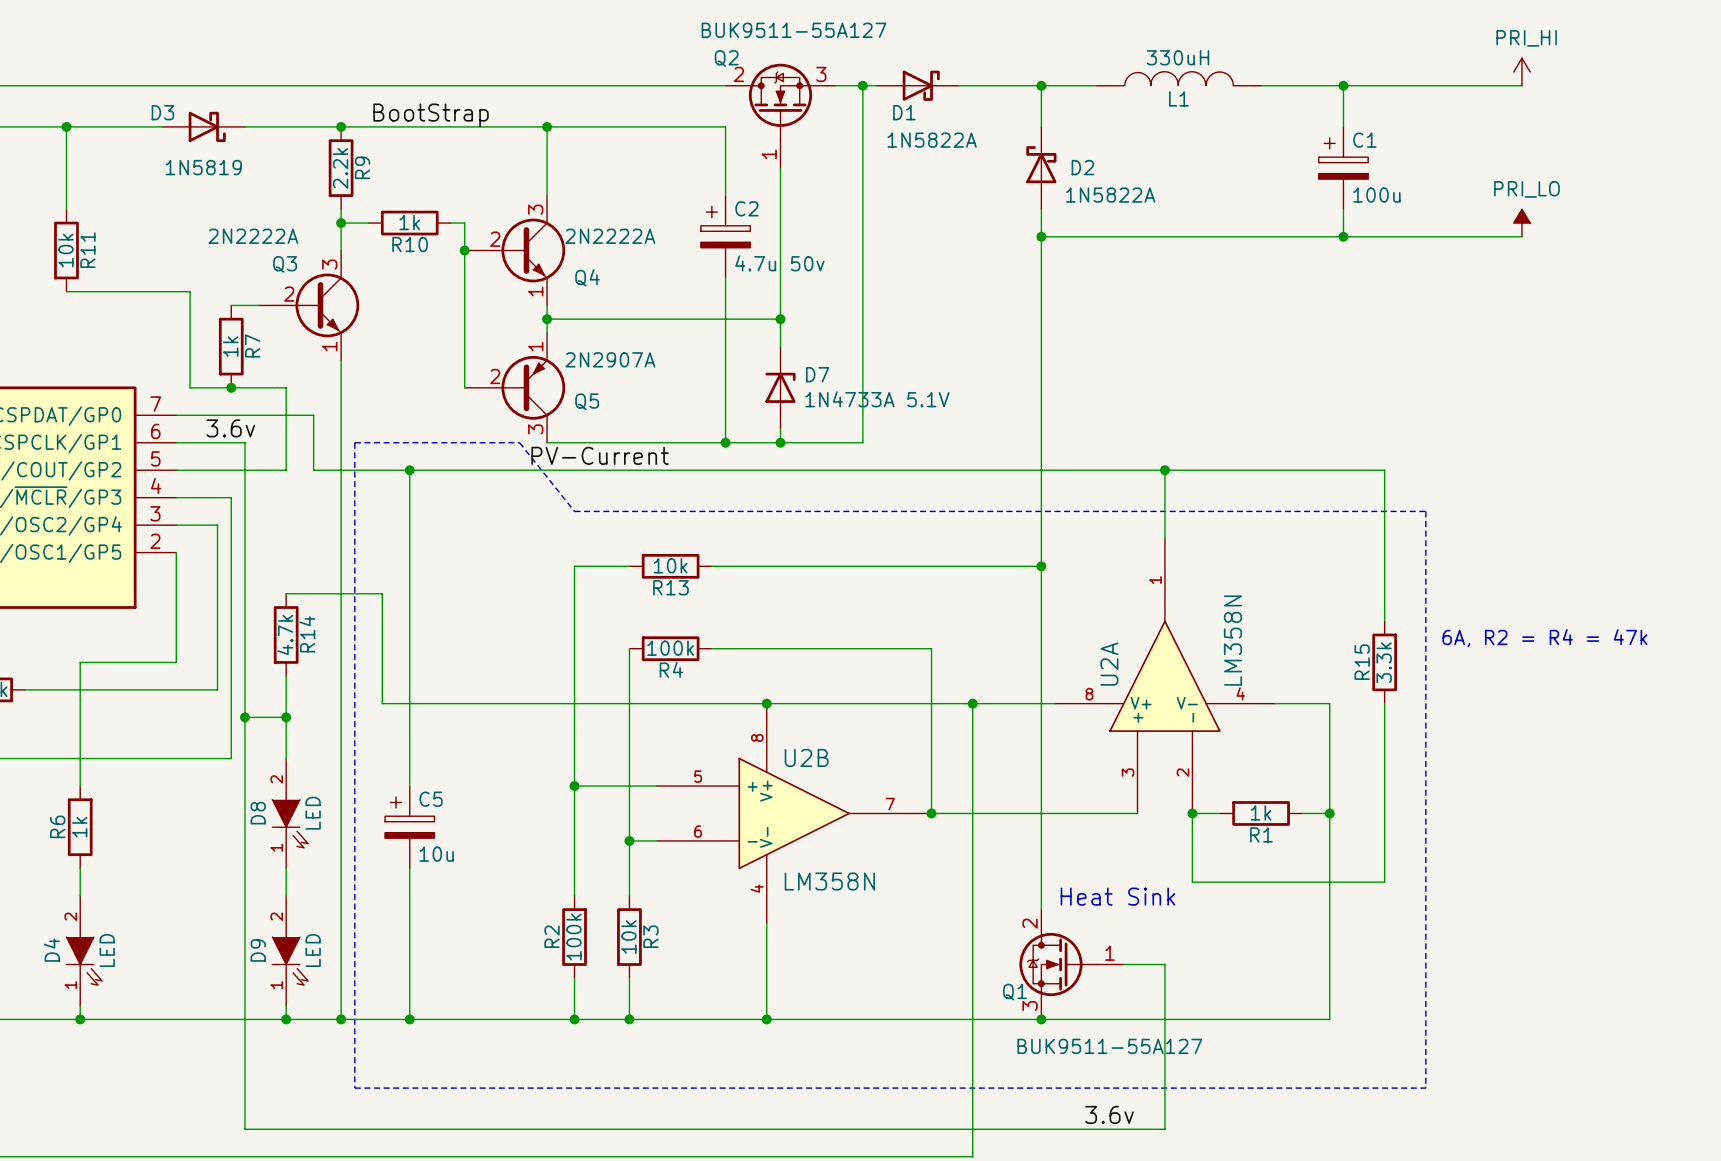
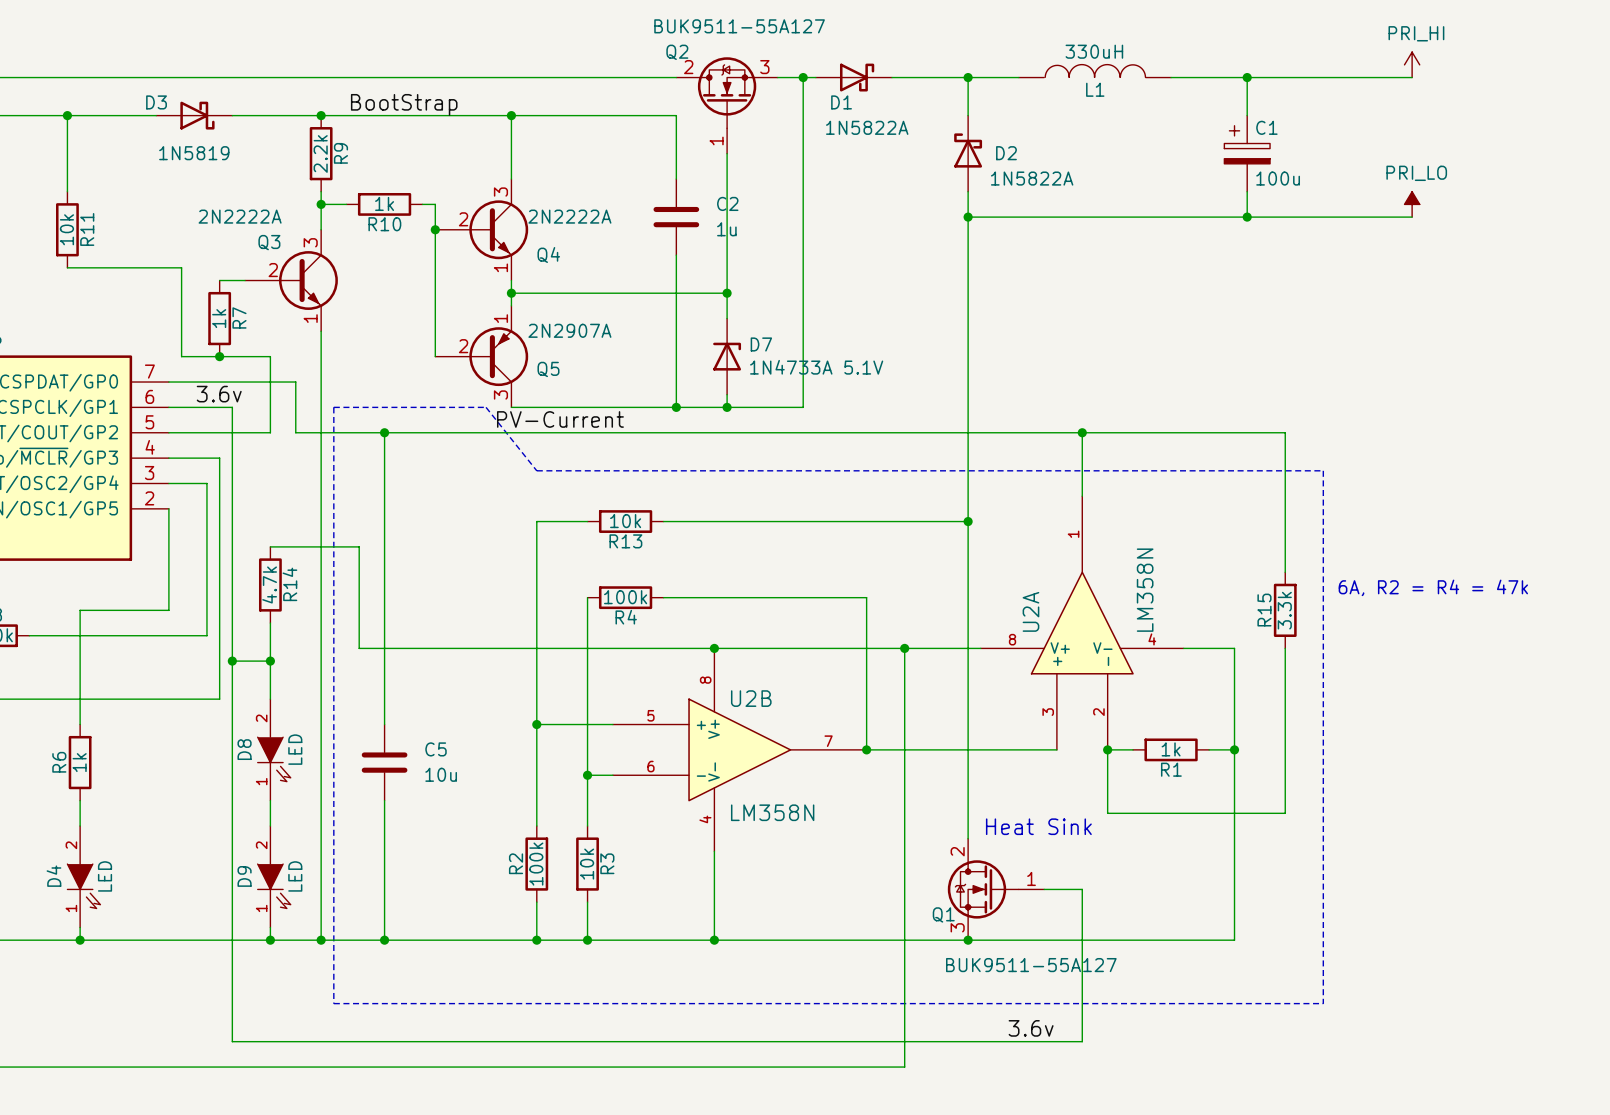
C2 symbol: [700, 195, 751, 278] -> [653, 179, 700, 256]
C2 name position: C2 (746, 208) -> C2 (727, 203)
C2 value: 4.7u 50v (779, 263) -> 1u (726, 229)
C5 symbol: [385, 786, 435, 869] -> [361, 724, 408, 801]
C5 name position: C5 (431, 799) -> C5 (436, 749)
C5 value position: 10u (436, 854) -> 10u (441, 774)

